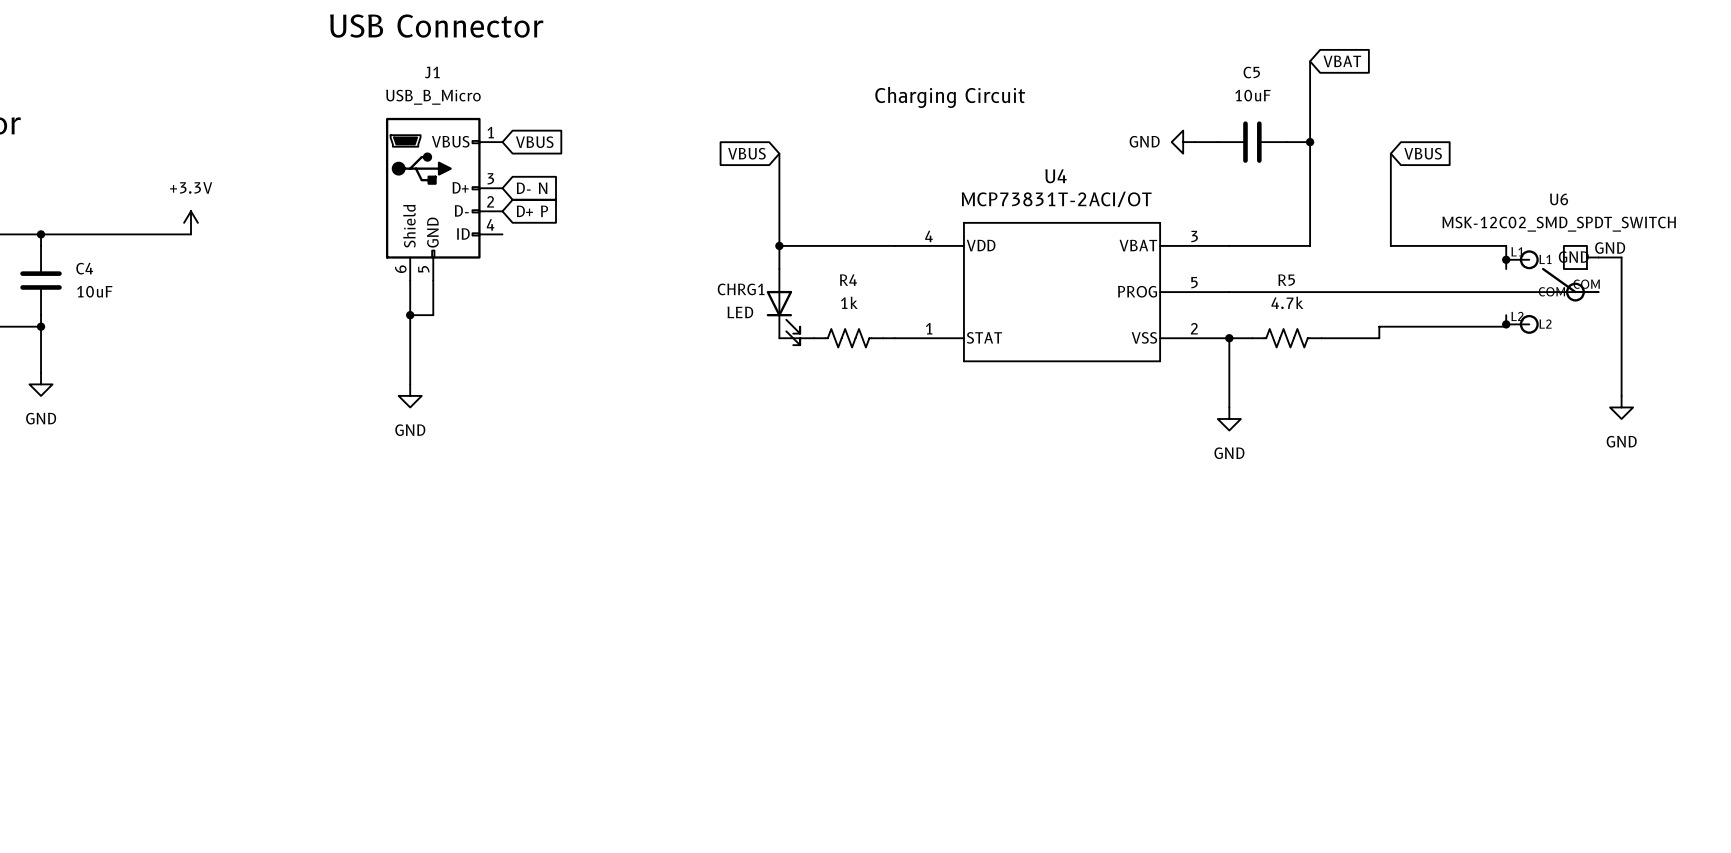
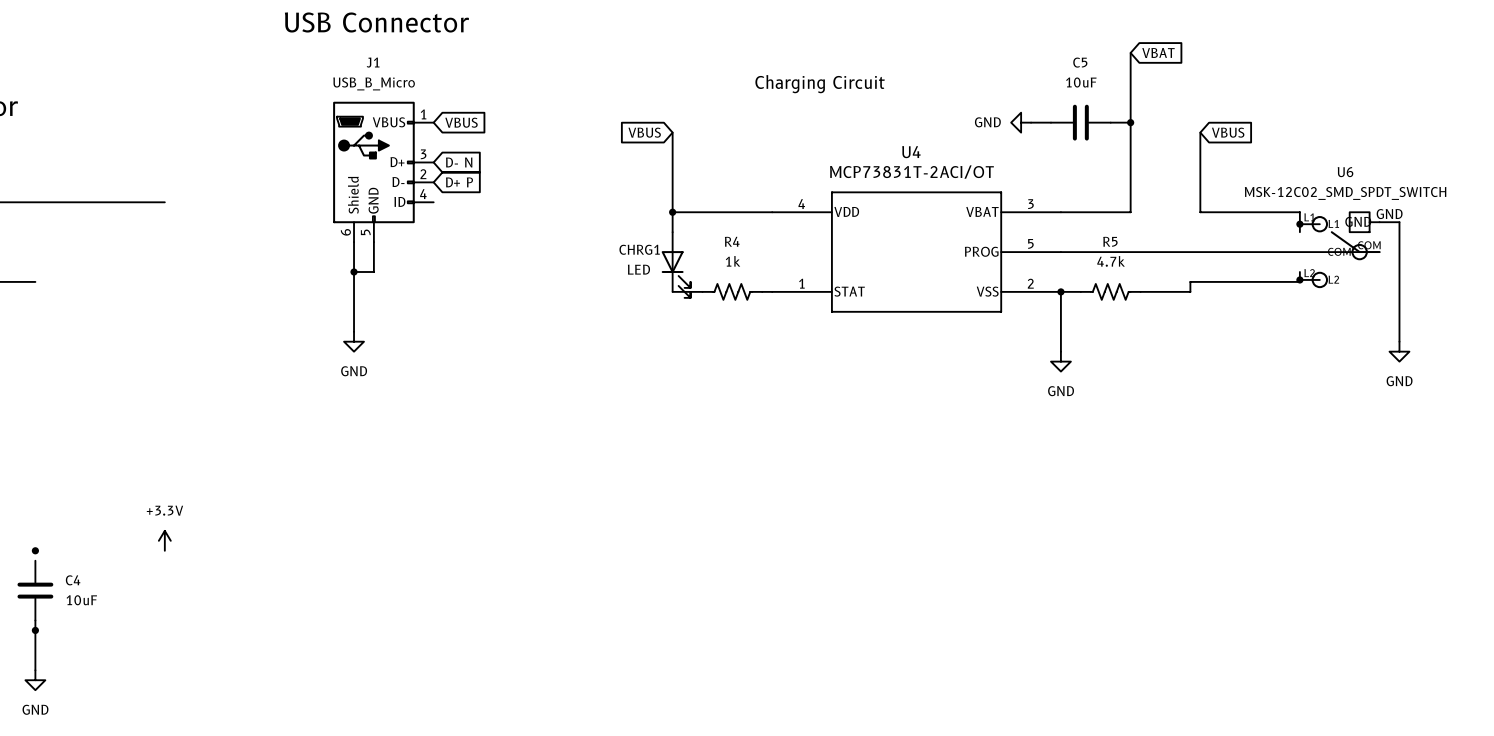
power symbol: +3.3V (191, 222) -> none
wire: (41, 234) (41, 245) -> none
junction: (41, 234) -> none
C4 position: (41, 280) -> (35, 590)
wire: (41, 315) (41, 372) -> none
junction: (41, 326) -> none
power symbol: GND (41, 384) -> none
power symbol: none -> +3.3V (164, 540)
junction: none -> (35, 550)
wire: none -> (35, 620) (35, 670)
junction: none -> (35, 630)
power symbol: none -> GND (35, 680)

